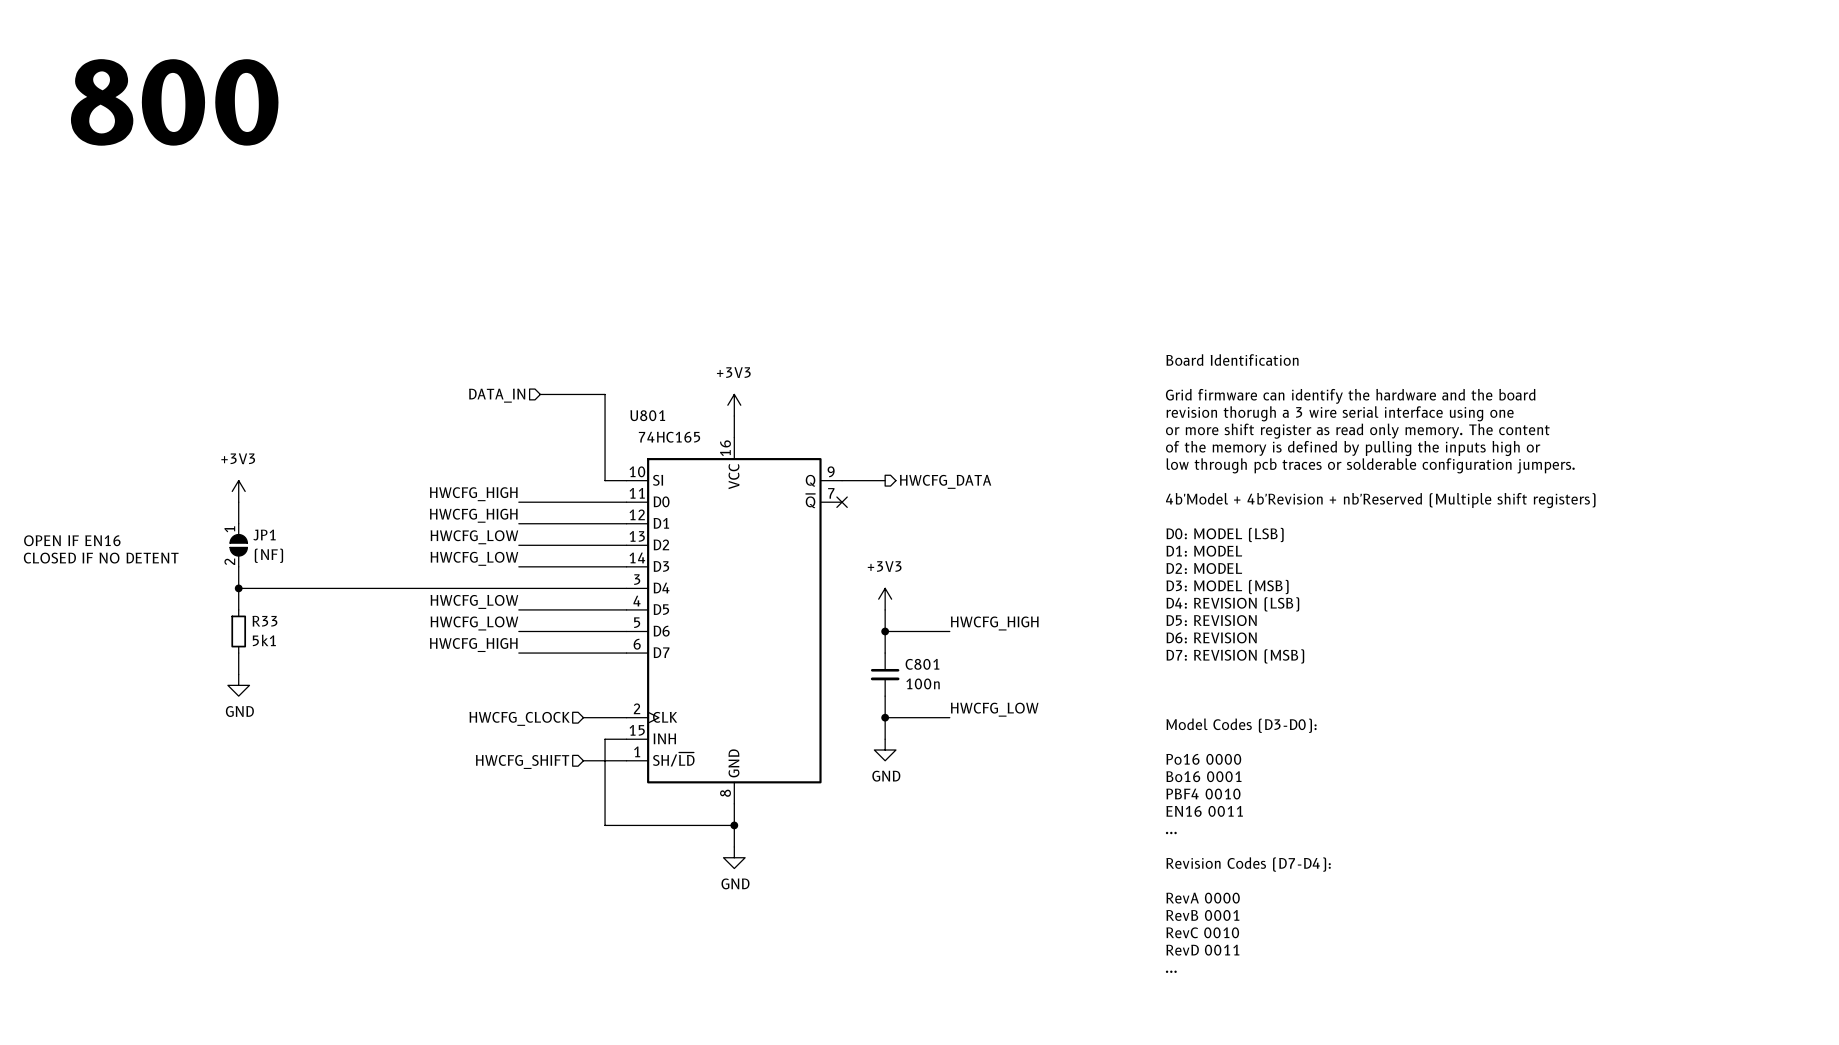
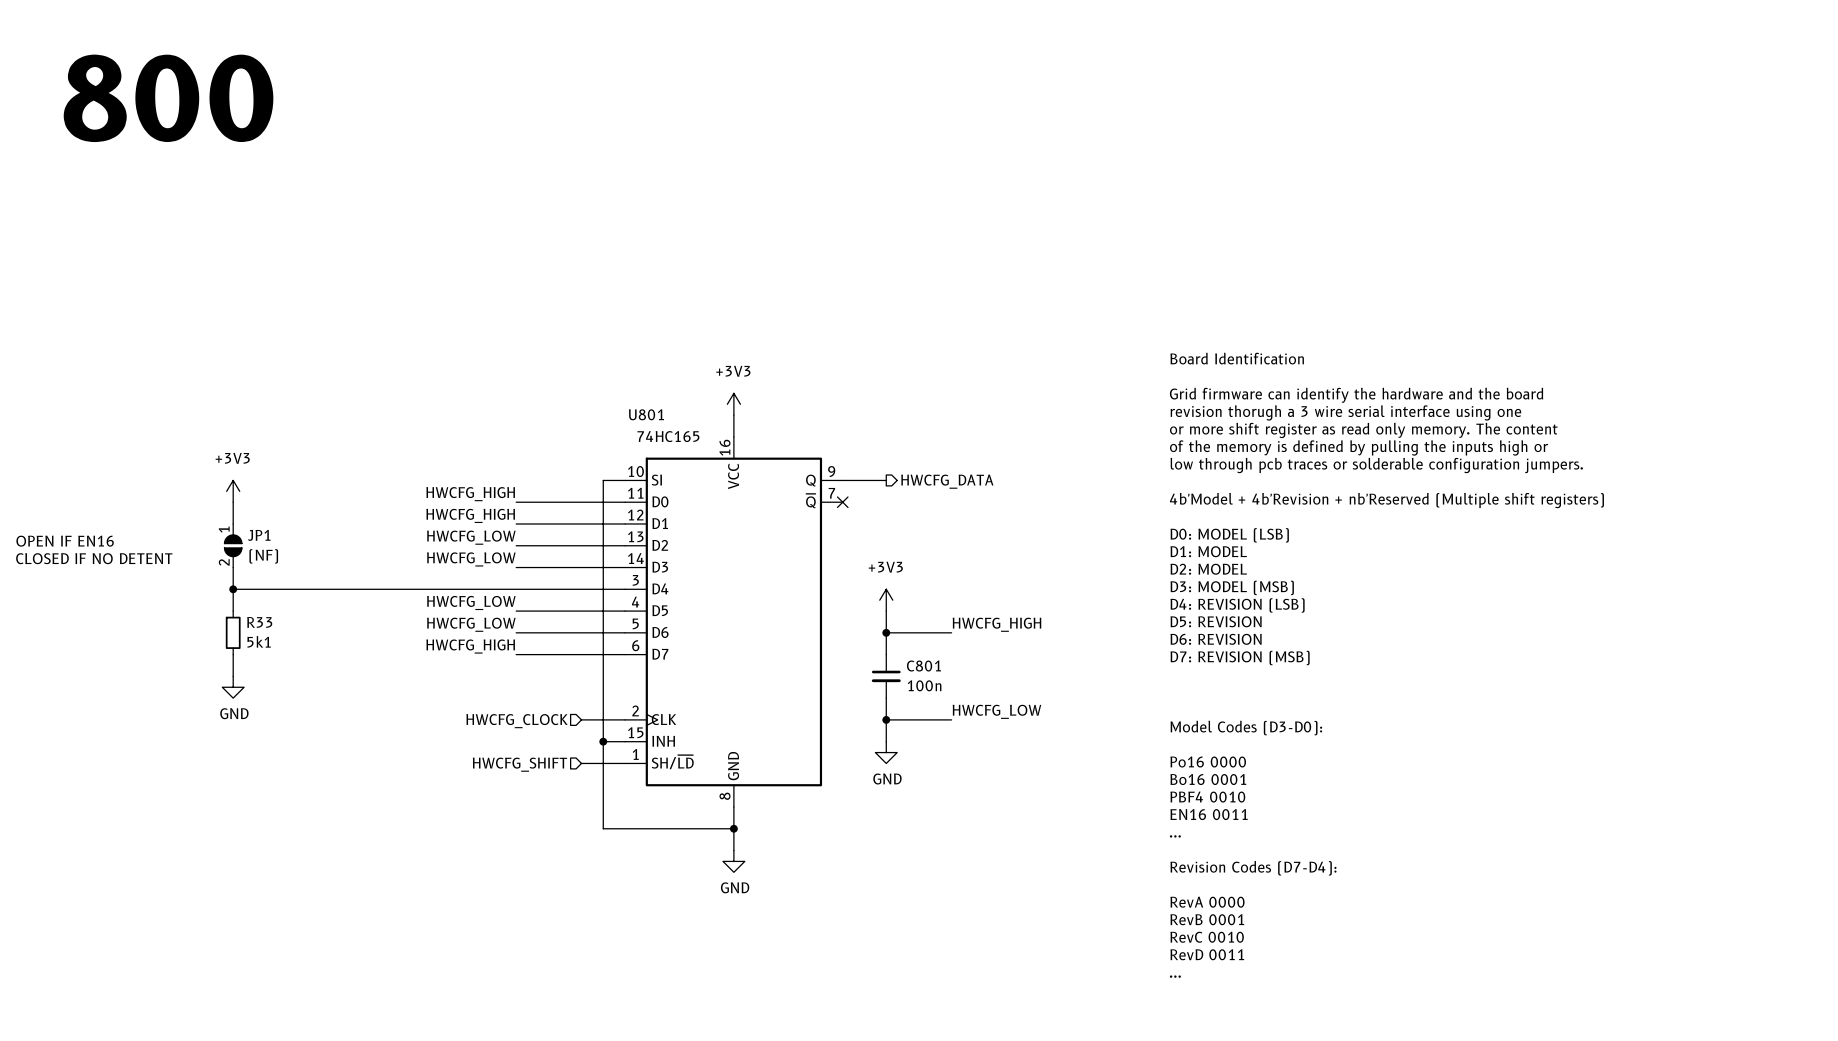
wire: (540, 394) (605, 394) (605, 480) -> (603, 741) (603, 480)
hierarchical label: DATA_IN (497, 395) -> none
junction: none -> (603, 741)

